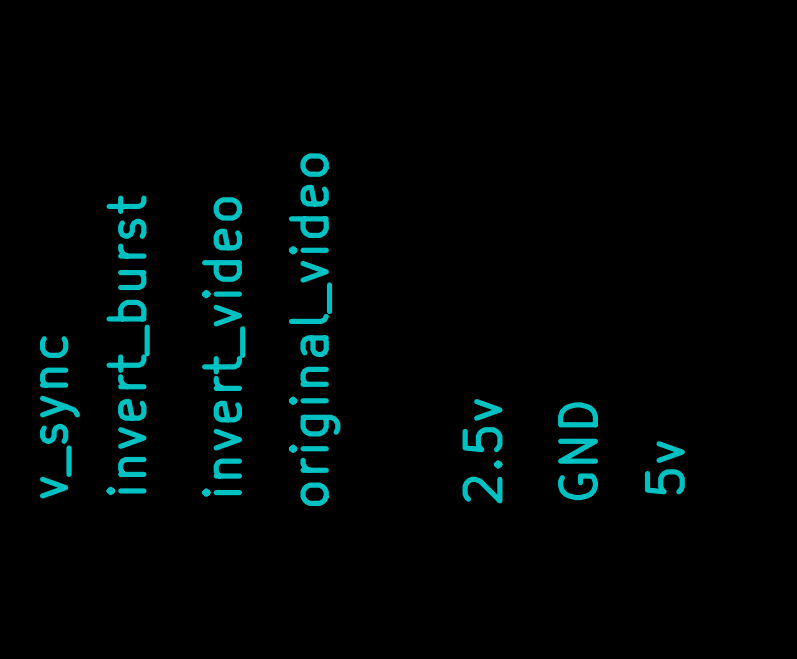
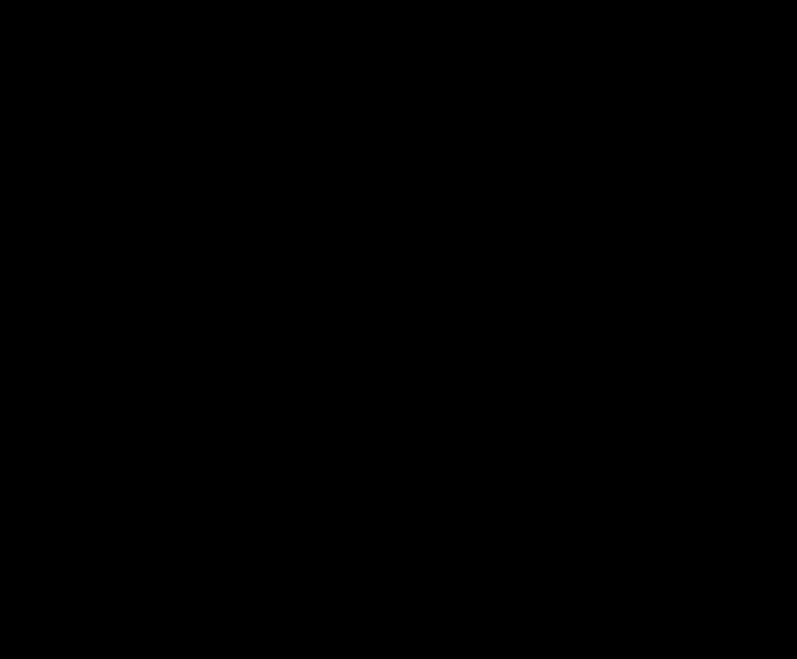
text: original_video (314, 329) -> none
text: invert_burst (128, 345) -> none
text: invert_video (223, 347) -> none
text: v_sync (59, 417) -> none
text: 2.5v (482, 451) -> none
text: GND (578, 451) -> none
text: 5v (664, 467) -> none

